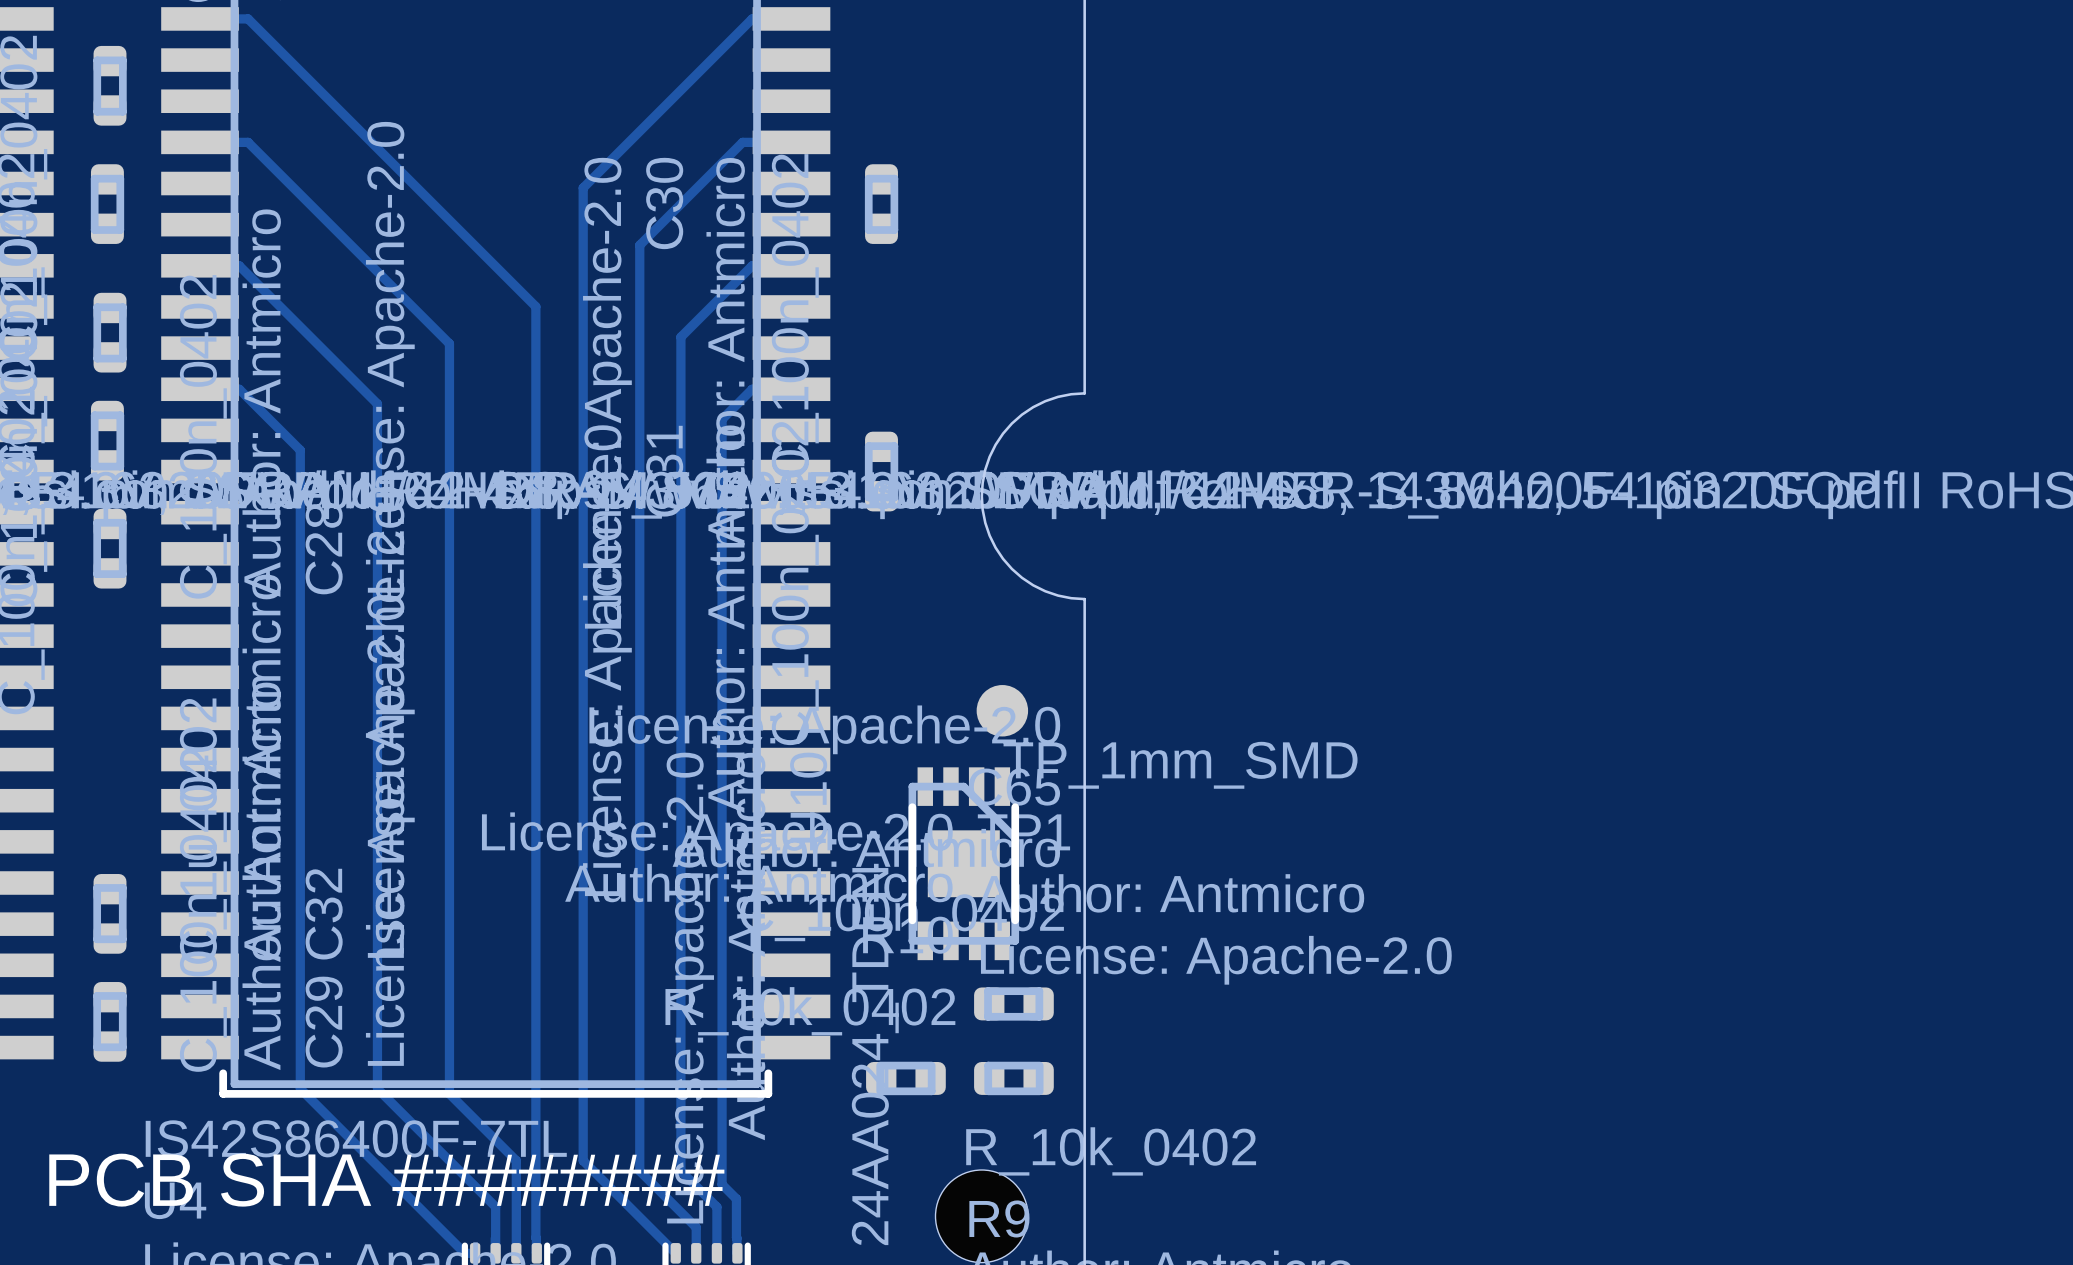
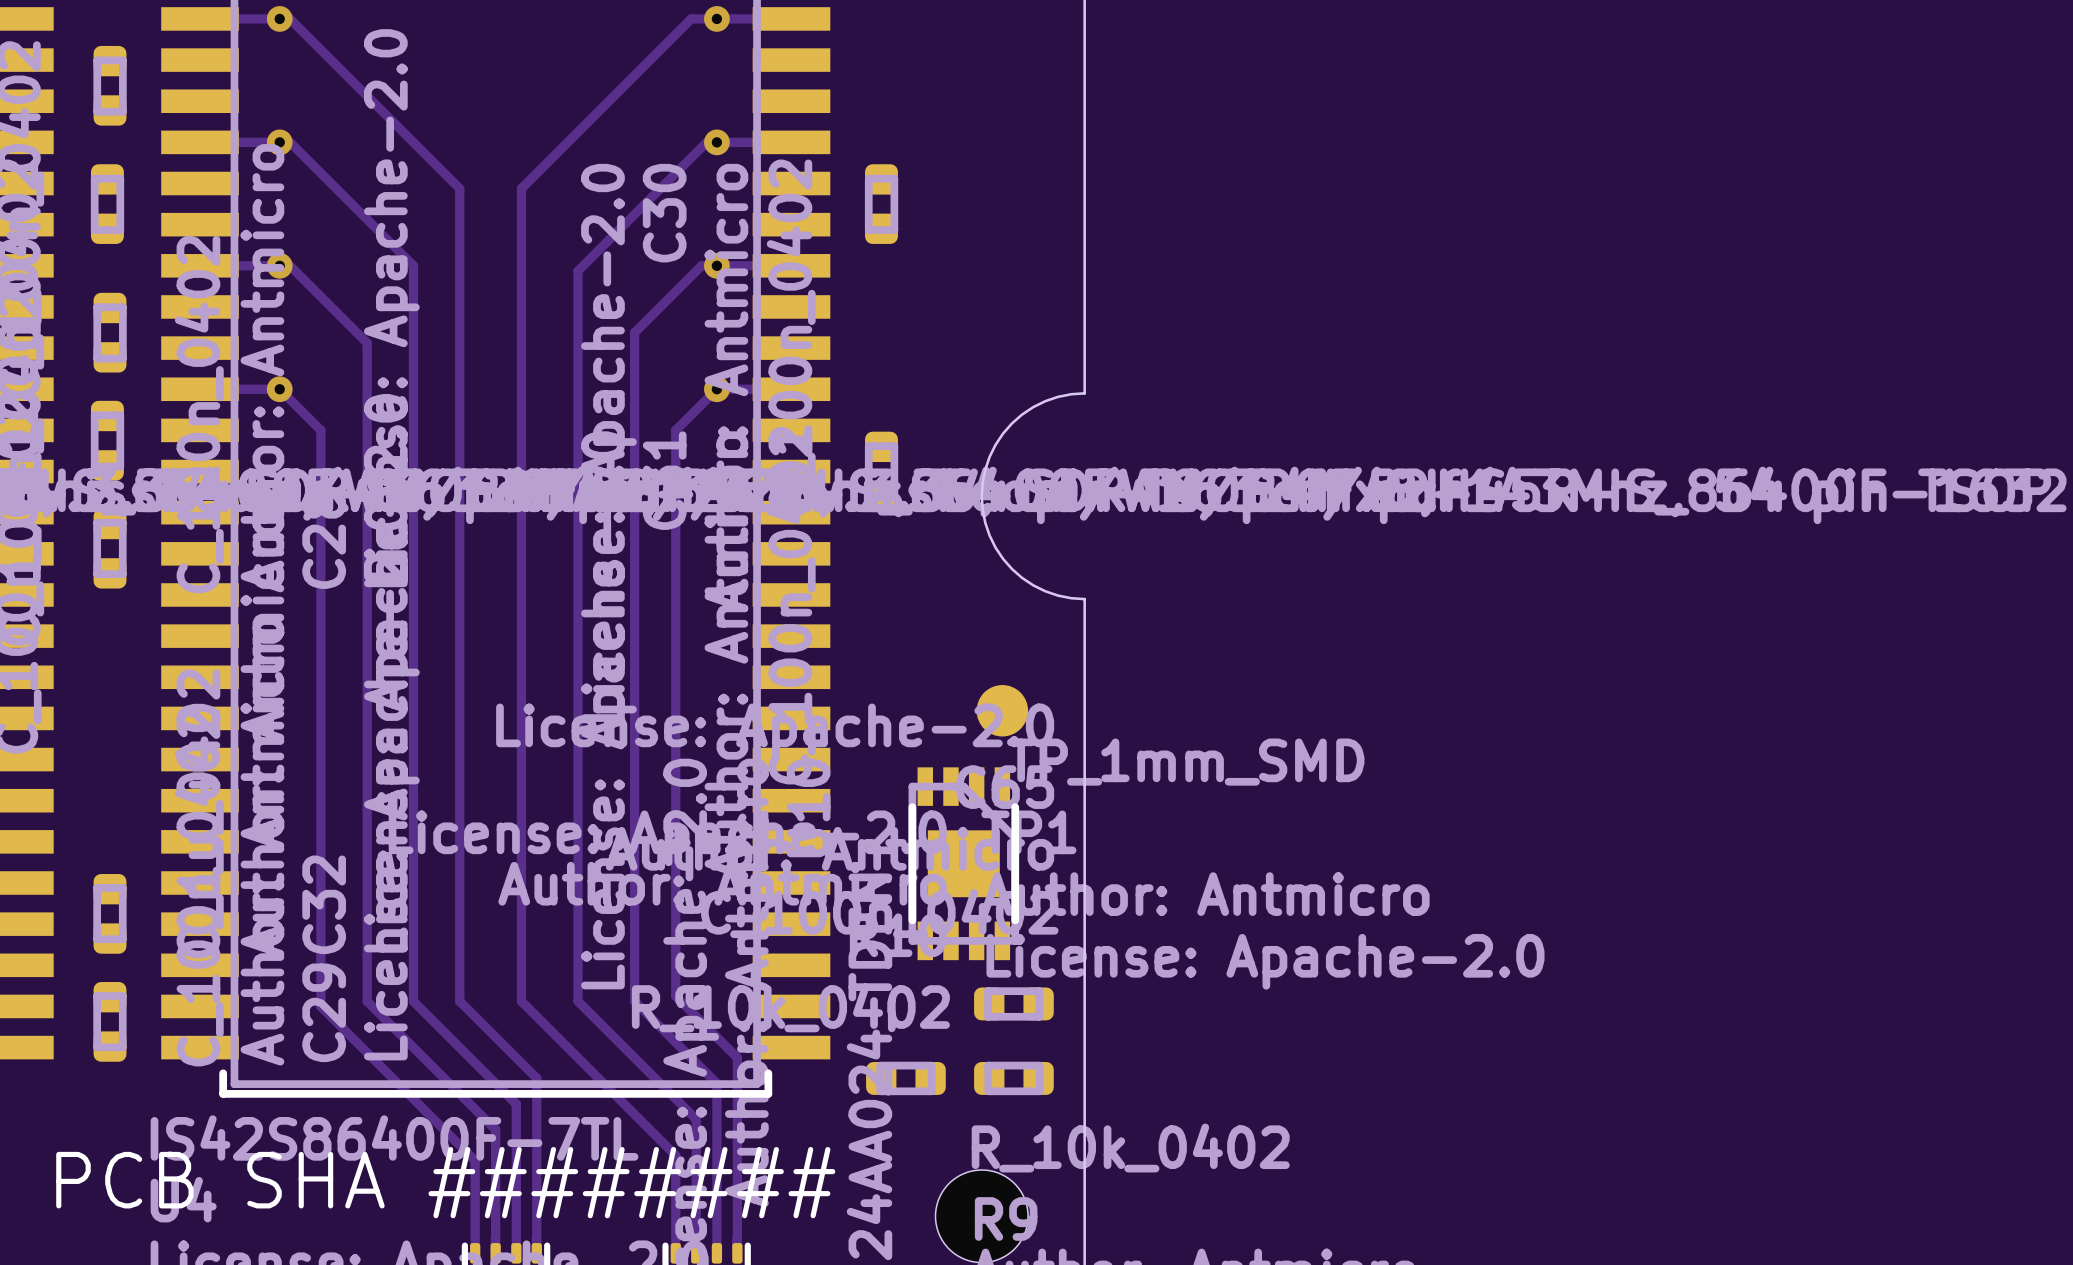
track: (248, 18) (535, 306) (535, 1237) -> (248, 18) (290, 18) (459, 188) (459, 1001) (536, 1078) (536, 1253)
via: none -> (279, 18)
via: none -> (716, 18)
track: (752, 18) (583, 187) (583, 1160) (675, 1253) -> (752, 18) (691, 18) (521, 188) (521, 1001) (675, 1155) (675, 1253)
track: (248, 142) (449, 343) (449, 1093) (516, 1160) -> (248, 142) (290, 142) (413, 265) (413, 1001) (516, 1104) (516, 1160)
via: none -> (279, 142)
via: none -> (716, 142)
track: (742, 142) (639, 245) (639, 1171) (696, 1227) -> (742, 142) (706, 142) (578, 270) (578, 1001) (696, 1119) (696, 1227)
track: (239, 265) (377, 403) (377, 1088) (495, 1206) -> (239, 265) (290, 265) (367, 342) (367, 1001) (495, 1129) (495, 1206)
via: none -> (279, 265)
via: none -> (716, 265)
track: (752, 265) (680, 337) (680, 1171) (716, 1207) -> (752, 265) (701, 265) (634, 332) (634, 1001) (716, 1083) (716, 1207)
track: (239, 389) (300, 450) (300, 1088) (464, 1253) (475, 1253) -> (239, 389) (279, 389) (320, 430) (320, 1006) (475, 1160) (475, 1253)
via: none -> (279, 389)
via: none -> (716, 389)
track: (752, 389) (722, 419) (722, 1184) (736, 1198) (736, 1237) -> (752, 389) (716, 389) (675, 430) (675, 996) (737, 1057) (737, 1253)

